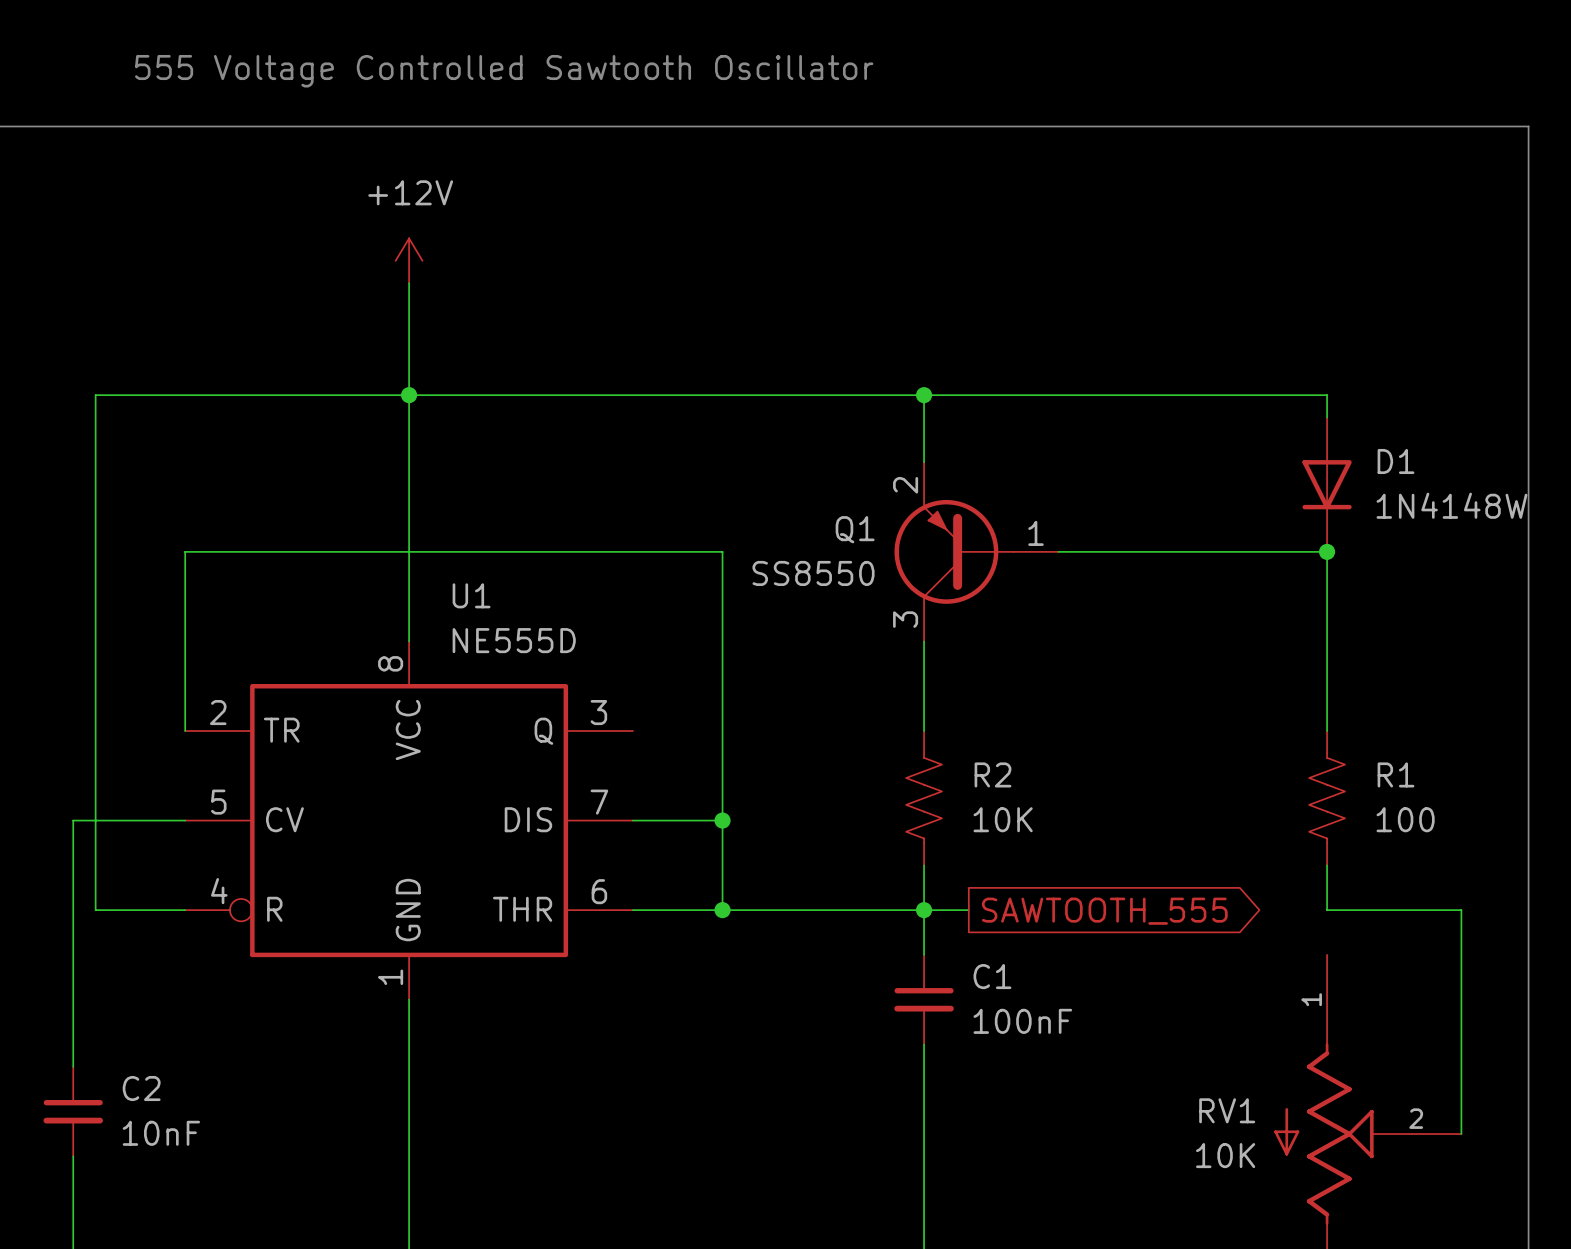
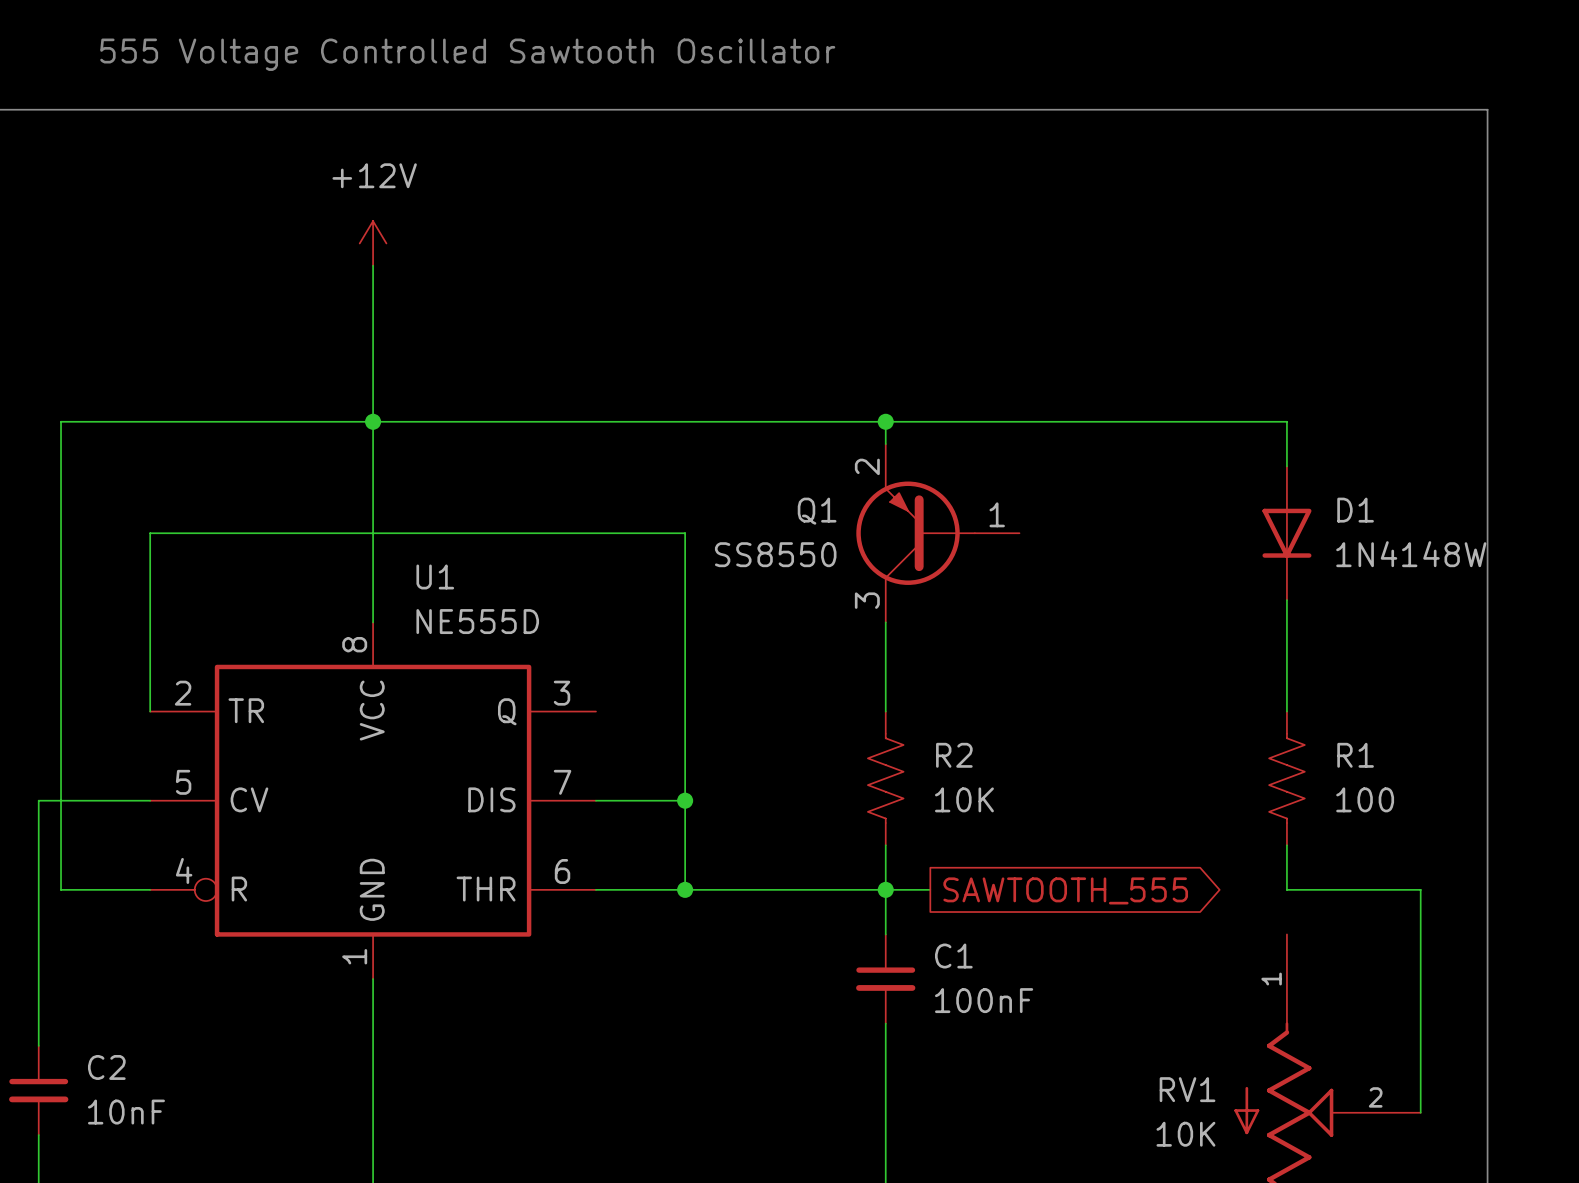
junction position: (409, 395) -> (373, 421)
wire: (924, 395) (924, 439) -> none
junction position: (924, 395) -> (885, 421)
wire: (1327, 417) (1327, 395) (95, 395) (95, 439) -> (1286, 466) (1286, 421) (61, 421)
D1 position: (1327, 484) -> (1286, 533)
wire: (1058, 551) (1327, 551) (1327, 619) -> none
junction: (1327, 551) -> none

